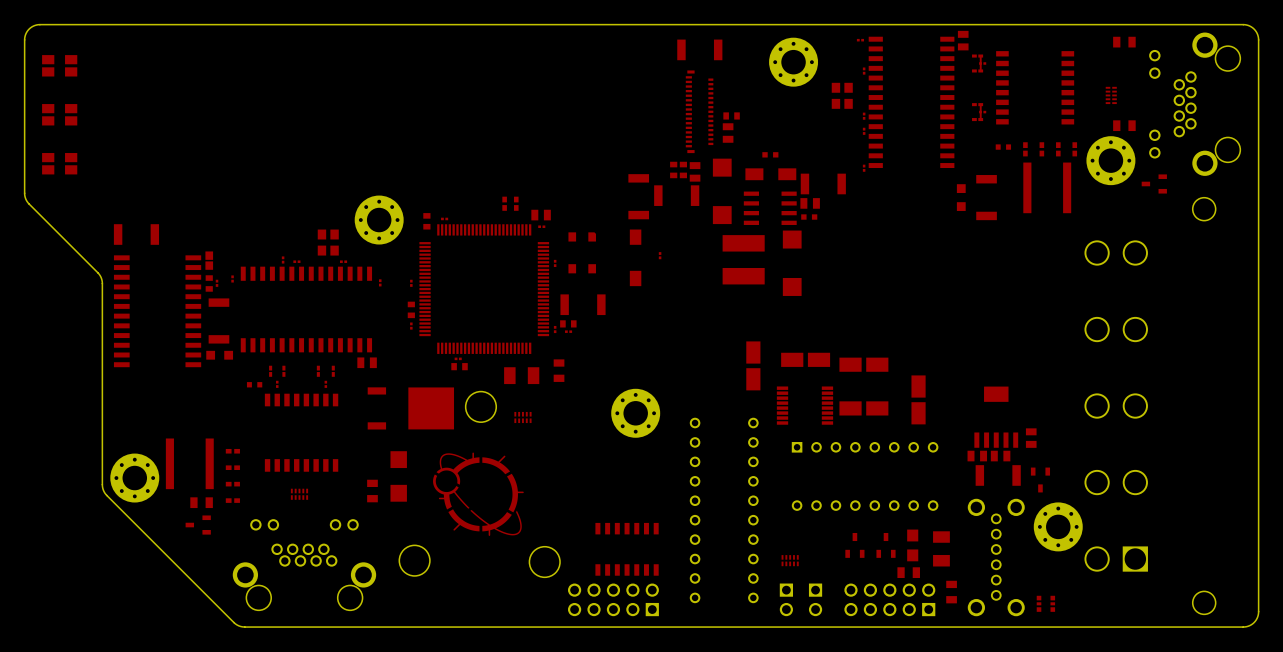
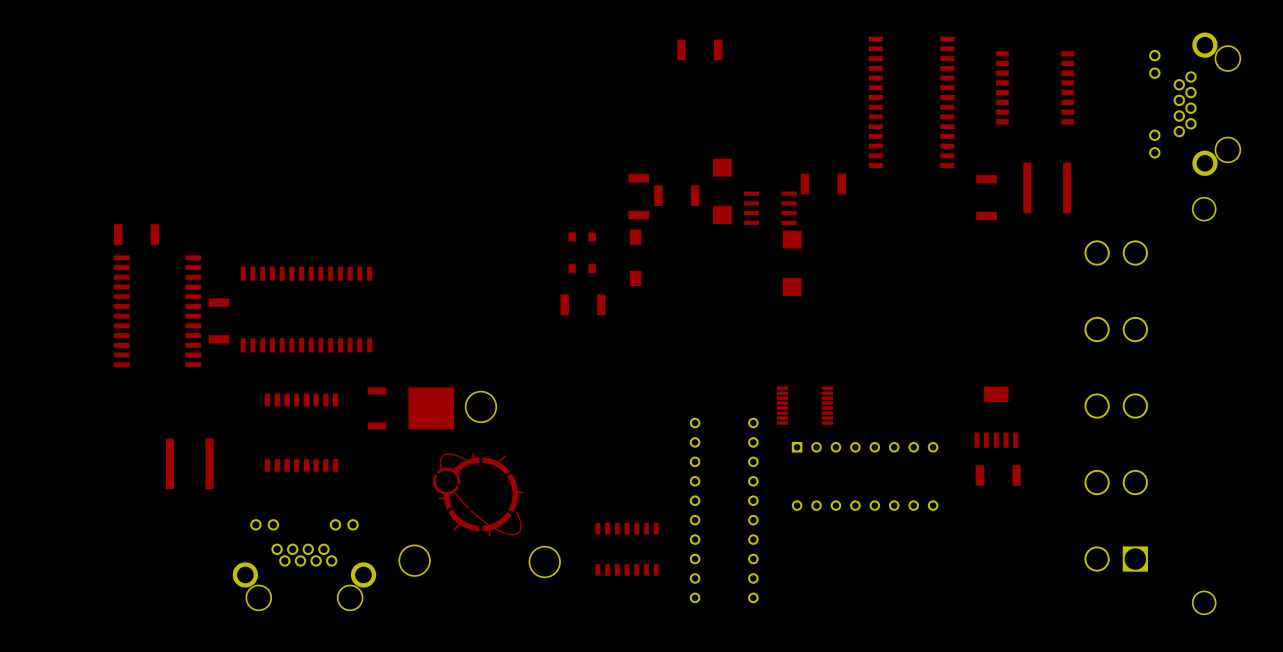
board edge: (1243, 24) (34, 25) (27, 30) (24, 38) (24, 194) (29, 204) (97, 272) (101, 279) (103, 490) (233, 622) (242, 626) (1248, 626) (1256, 619) (1258, 611) (1258, 39) (1254, 29) (1243, 24) -> none
part: (860, 40) -> none
part: (963, 40) -> none
part: (1124, 42) -> none
part: (977, 56) -> none
top track: (980, 56) (980, 70) -> none
part: (793, 62) -> none
part: (982, 63) -> none
part: (59, 65) -> none
part: (977, 70) -> none
part: (864, 71) -> none
part: (842, 95) -> none
part: (1111, 95) -> none
part: (977, 104) -> none
top track: (980, 104) (980, 119) -> none
part: (699, 111) -> none
part: (982, 112) -> none
part: (59, 114) -> none
part: (731, 115) -> none
part: (864, 116) -> none
part: (977, 119) -> none
part: (1124, 125) -> none
part: (864, 131) -> none
part: (728, 133) -> none
part: (1003, 147) -> none
part: (1025, 149) -> none
part: (1041, 149) -> none
part: (1058, 149) -> none
part: (1074, 149) -> none
part: (770, 154) -> none
part: (1110, 160) -> none
part: (59, 163) -> none
part: (864, 168) -> none
part: (673, 169) -> none
part: (683, 169) -> none
part: (695, 171) -> none
part: (770, 174) -> none
part: (1154, 183) -> none
part: (961, 197) -> none
part: (504, 203) -> none
part: (516, 203) -> none
part: (810, 203) -> none
part: (541, 215) -> none
part: (809, 217) -> none
part: (444, 218) -> none
part: (379, 220) -> none
part: (426, 221) -> none
part: (541, 226) -> none
part: (328, 242) -> none
part: (660, 255) -> none
part: (283, 259) -> none
part: (743, 259) -> none
part: (209, 260) -> none
part: (296, 261) -> none
part: (343, 261) -> none
part: (555, 263) -> none
part: (232, 278) -> none
part: (380, 282) -> none
part: (209, 283) -> none
part: (217, 283) -> none
part: (411, 283) -> none
part: (484, 289) -> none
part: (411, 309) -> none
part: (568, 323) -> none
part: (411, 326) -> none
part: (555, 329) -> none
part: (568, 331) -> none
part: (219, 355) -> none
part: (458, 358) -> none
part: (805, 359) -> none
part: (367, 362) -> none
part: (863, 364) -> none
part: (753, 365) -> none
part: (459, 366) -> none
part: (559, 370) -> none
part: (270, 371) -> none
part: (283, 371) -> none
part: (318, 371) -> none
part: (333, 371) -> none
part: (521, 375) -> none
part: (254, 384) -> none
part: (277, 384) -> none
part: (325, 384) -> none
part: (918, 399) -> none
part: (863, 408) -> none
part: (635, 413) -> none
part: (522, 417) -> none
part: (1031, 438) -> none
part: (232, 451) -> none
part: (977, 456) -> none
part: (1000, 456) -> none
part: (232, 467) -> none
part: (398, 476) -> none
part: (134, 478) -> none
part: (1040, 480) -> none
part: (232, 484) -> none
part: (372, 491) -> none
part: (299, 494) -> none
part: (232, 500) -> none
part: (201, 502) -> none
part: (198, 525) -> none
part: (1058, 526) -> none
part: (854, 545) -> none
part: (886, 545) -> none
part: (912, 545) -> none
part: (941, 548) -> none
part: (996, 557) -> none
part: (790, 560) -> none
part: (908, 572) -> none
part: (951, 592) -> none
part: (613, 599) -> none
part: (786, 599) -> none
part: (815, 599) -> none
part: (889, 599) -> none
part: (1045, 603) -> none

